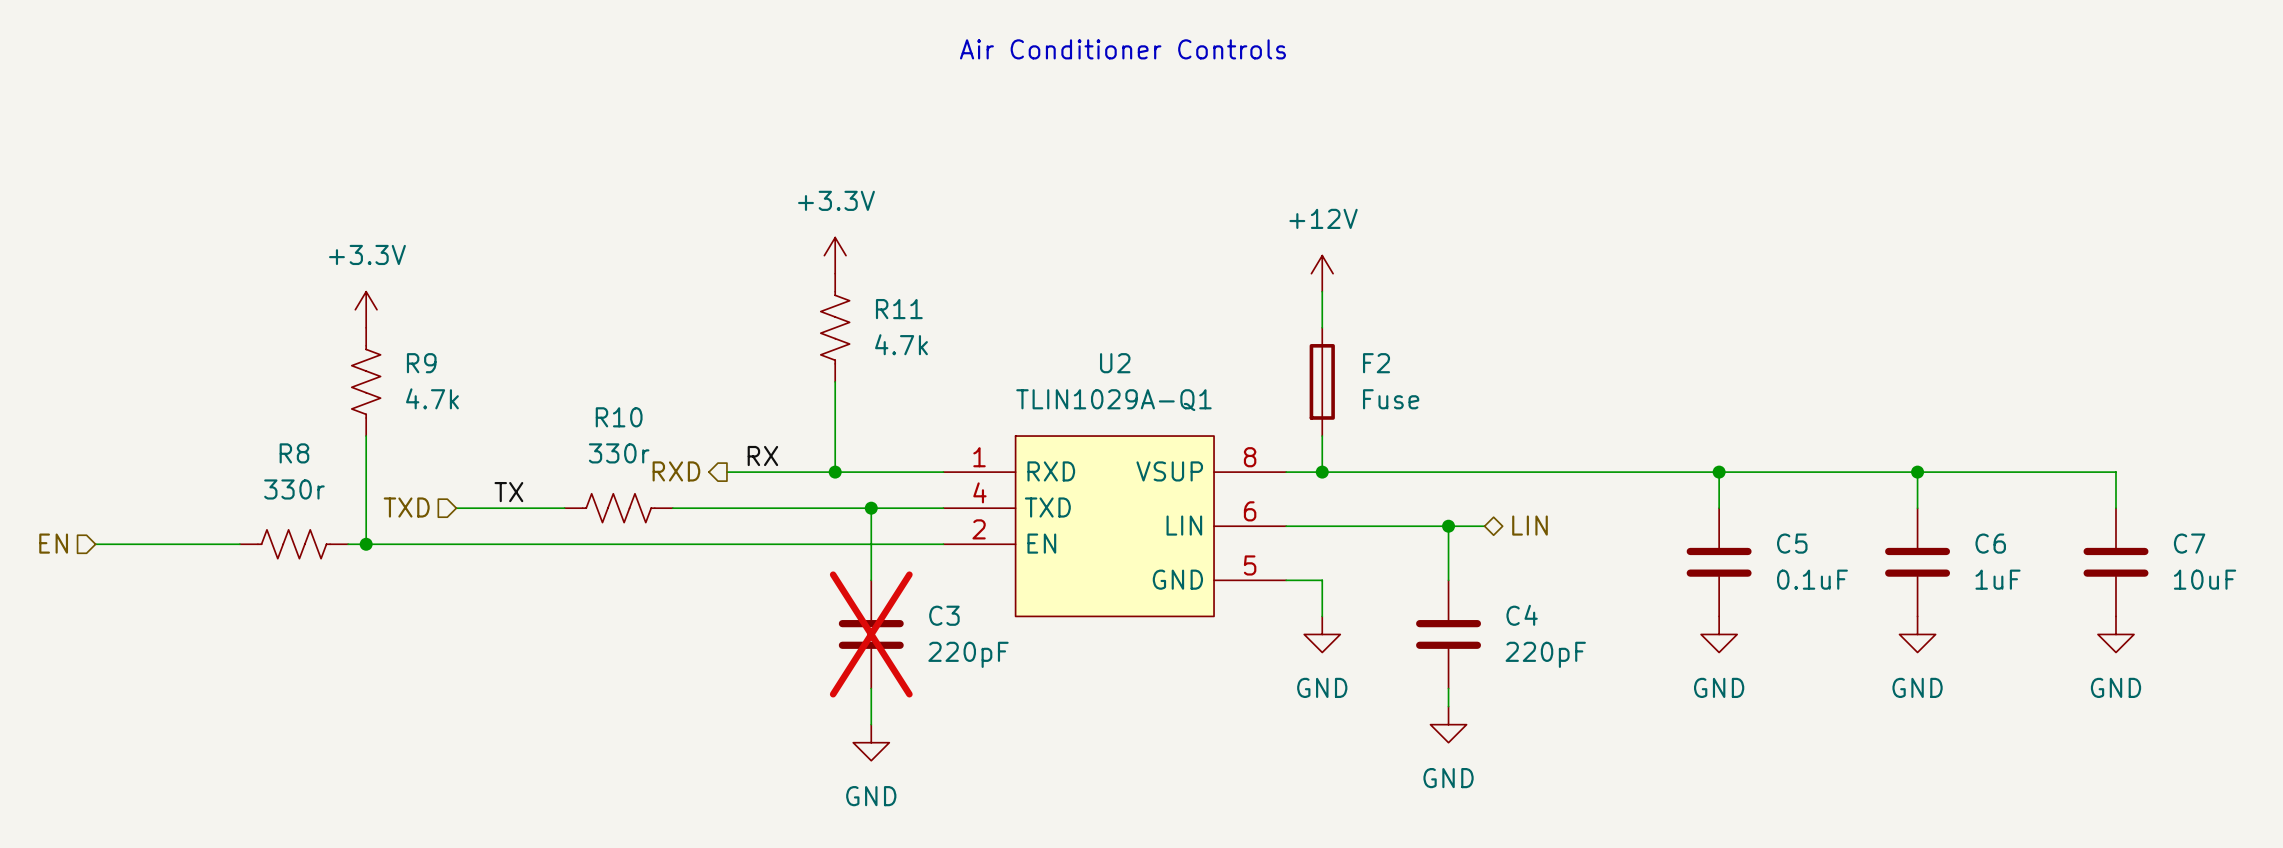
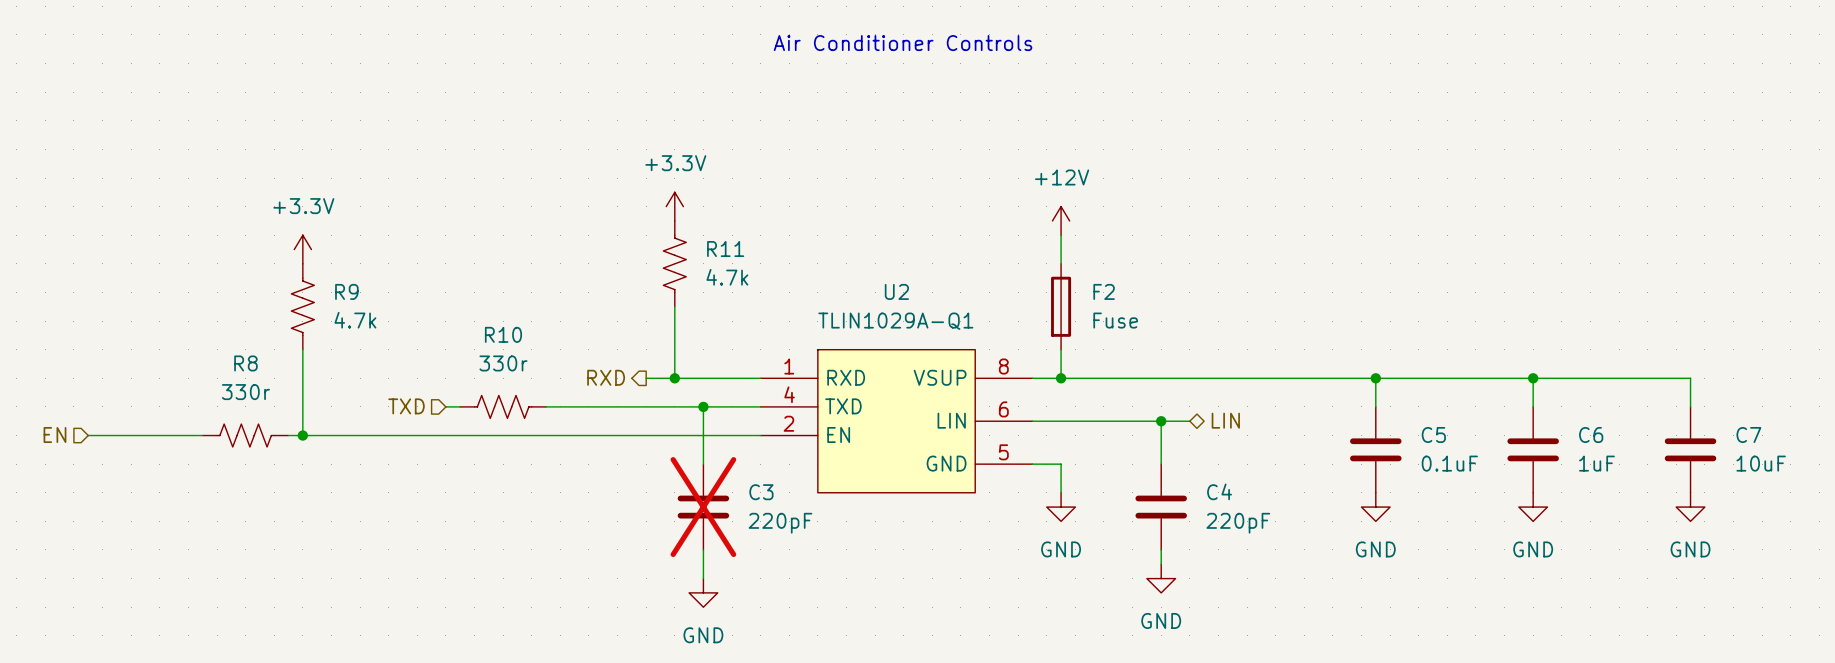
label: RX (762, 456) -> none
hierarchical label position: RXD (676, 471) -> RXD (606, 377)
wire: (726, 472) (799, 472) -> none
label: TX (508, 492) -> none
hierarchical label position: TXD (406, 507) -> TXD (406, 406)
wire: (456, 508) (546, 508) -> none

